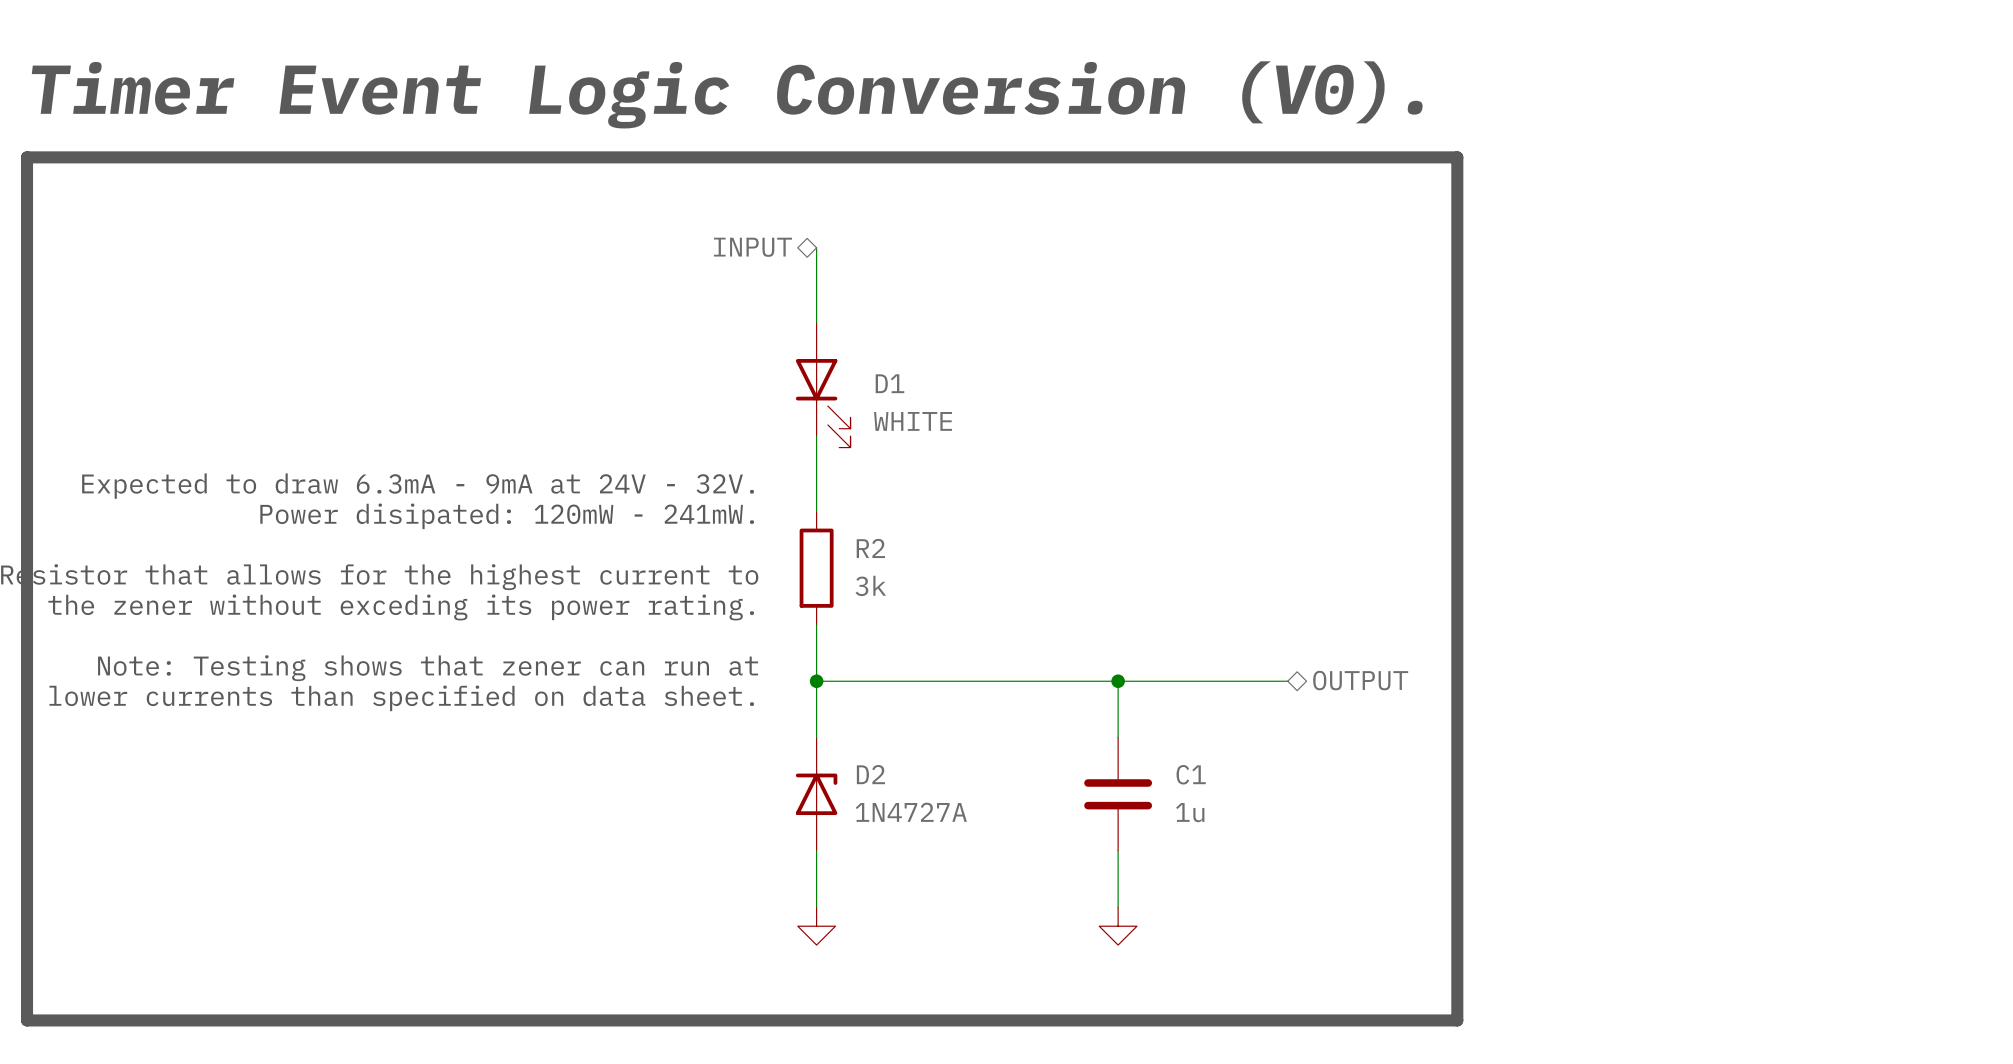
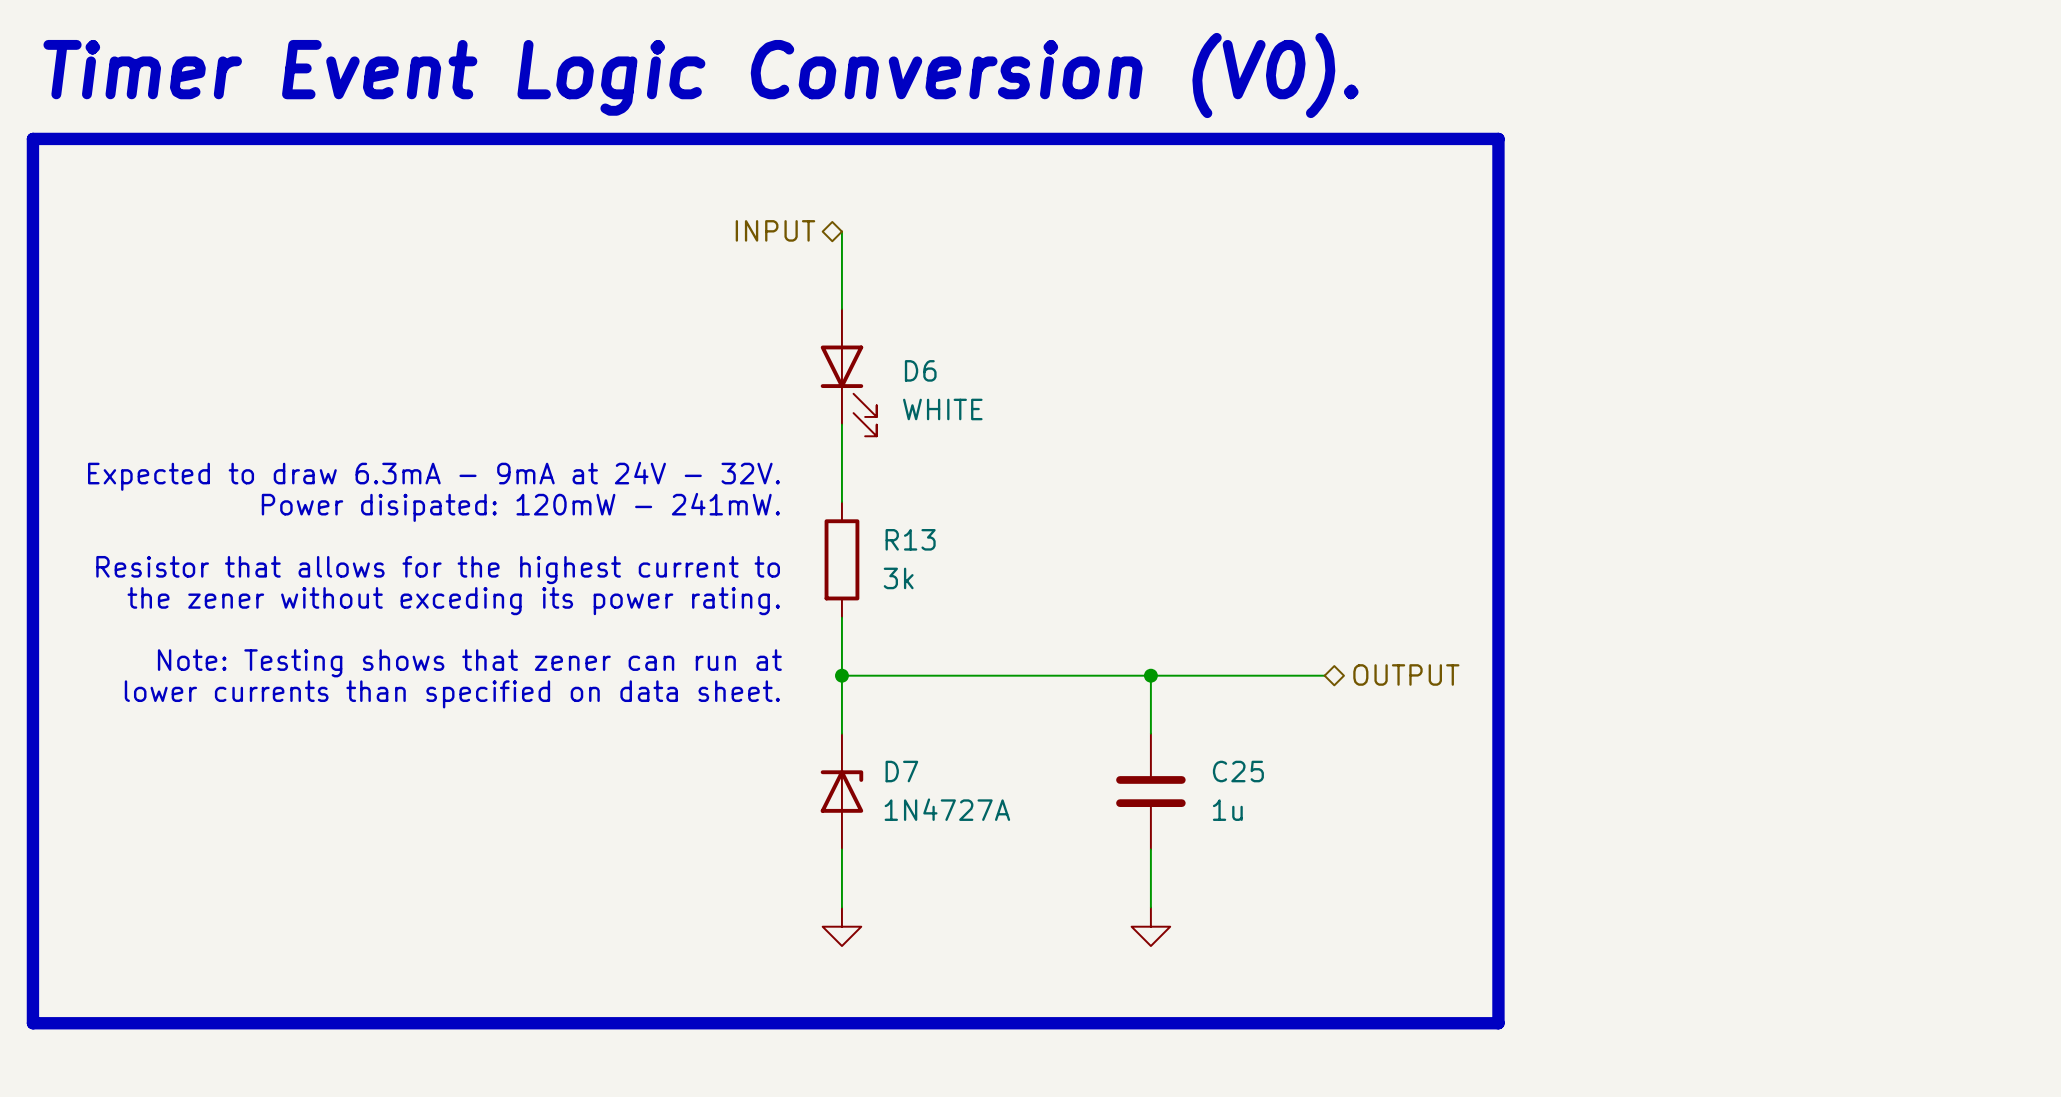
D1 name: D1 (889, 383) -> D6 (920, 370)
R2 name: R2 (870, 548) -> R13 (910, 539)
D2 name: D2 (870, 774) -> D7 (901, 771)
C1 name: C1 (1191, 774) -> C25 (1238, 771)

